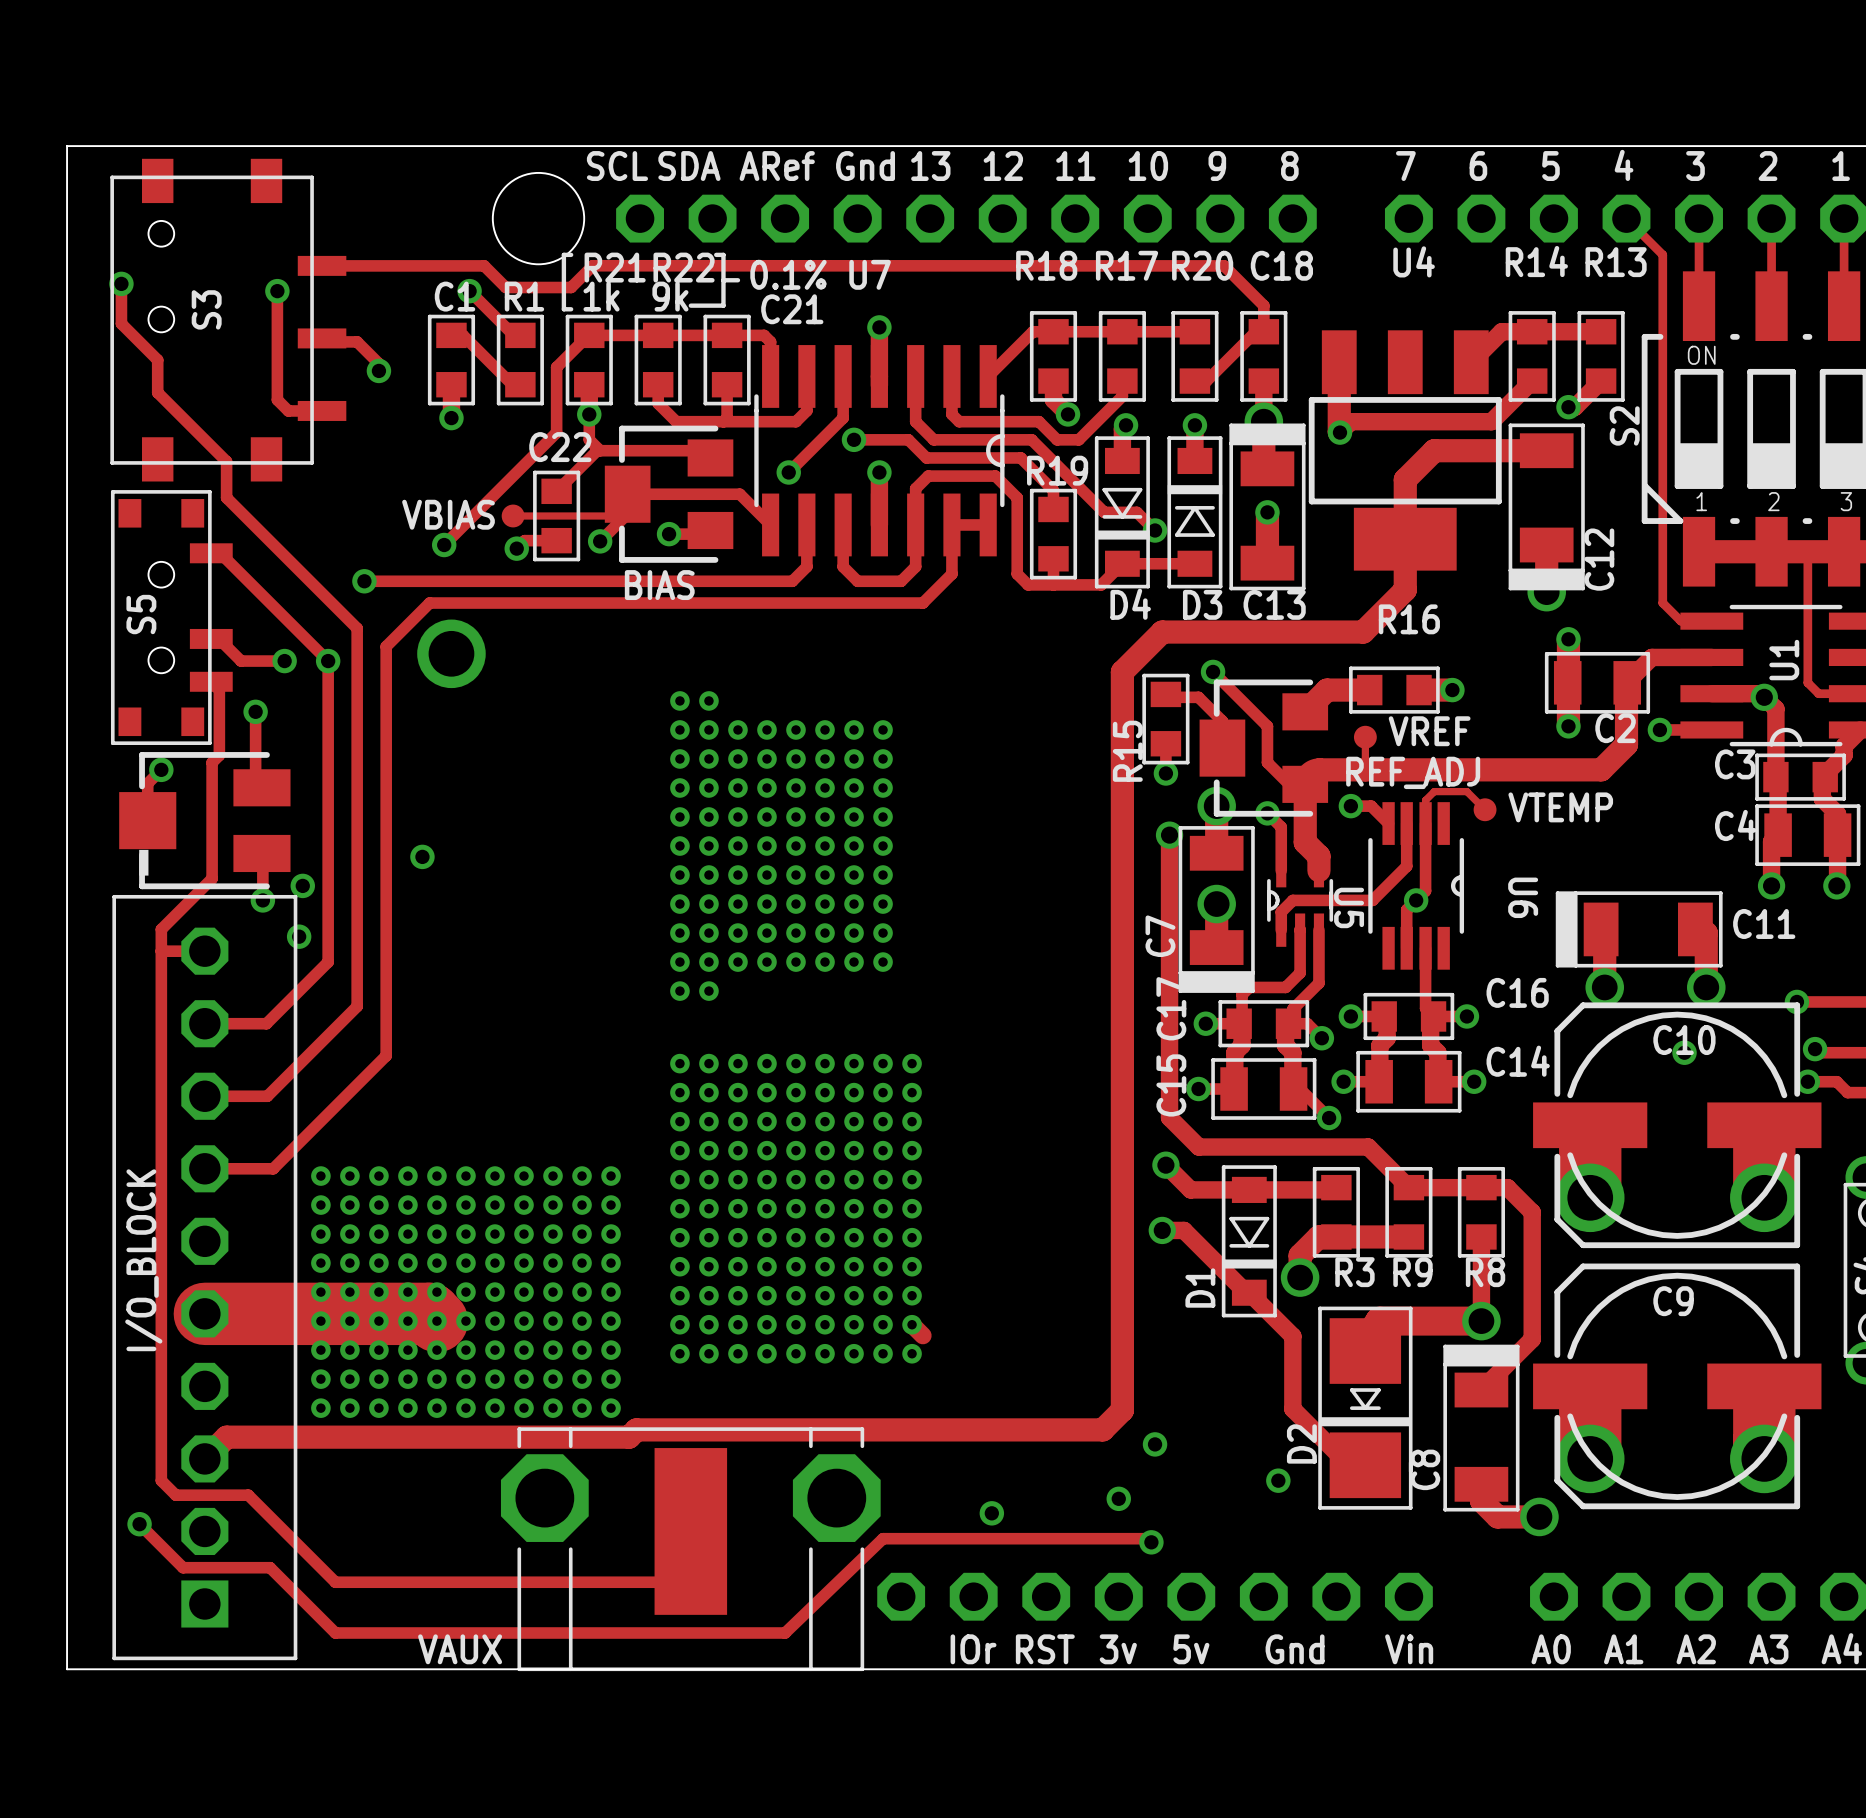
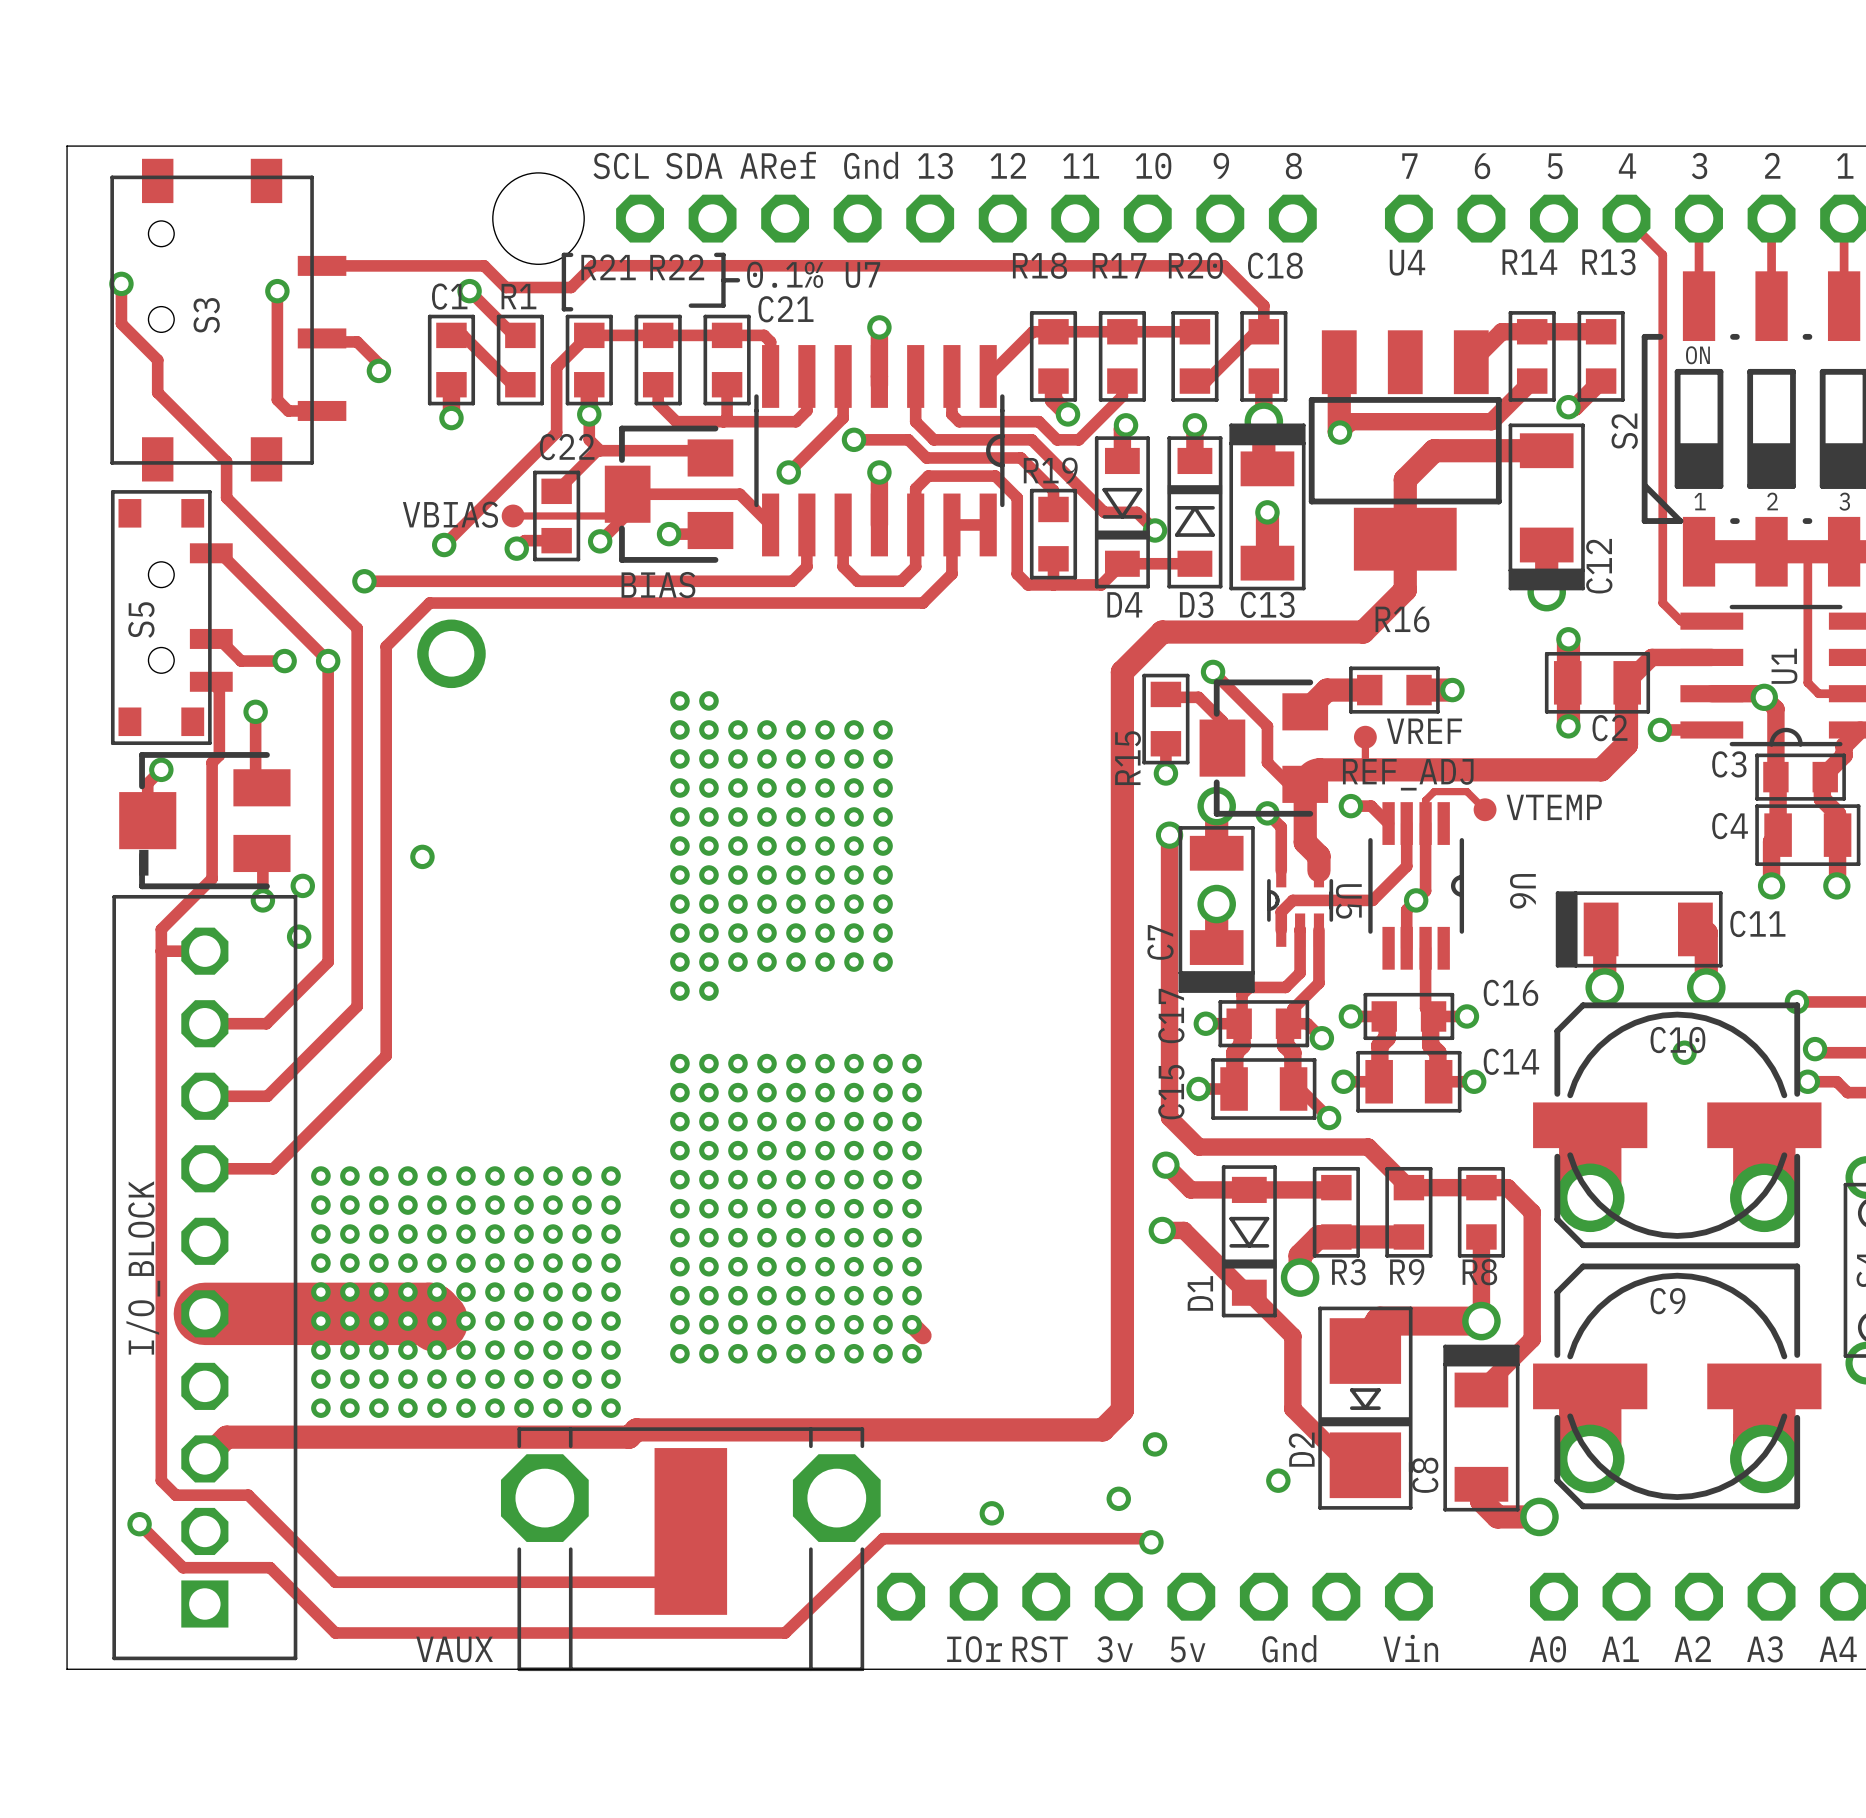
text: 1k (601, 296) -> none
text: 9k (670, 296) -> none

